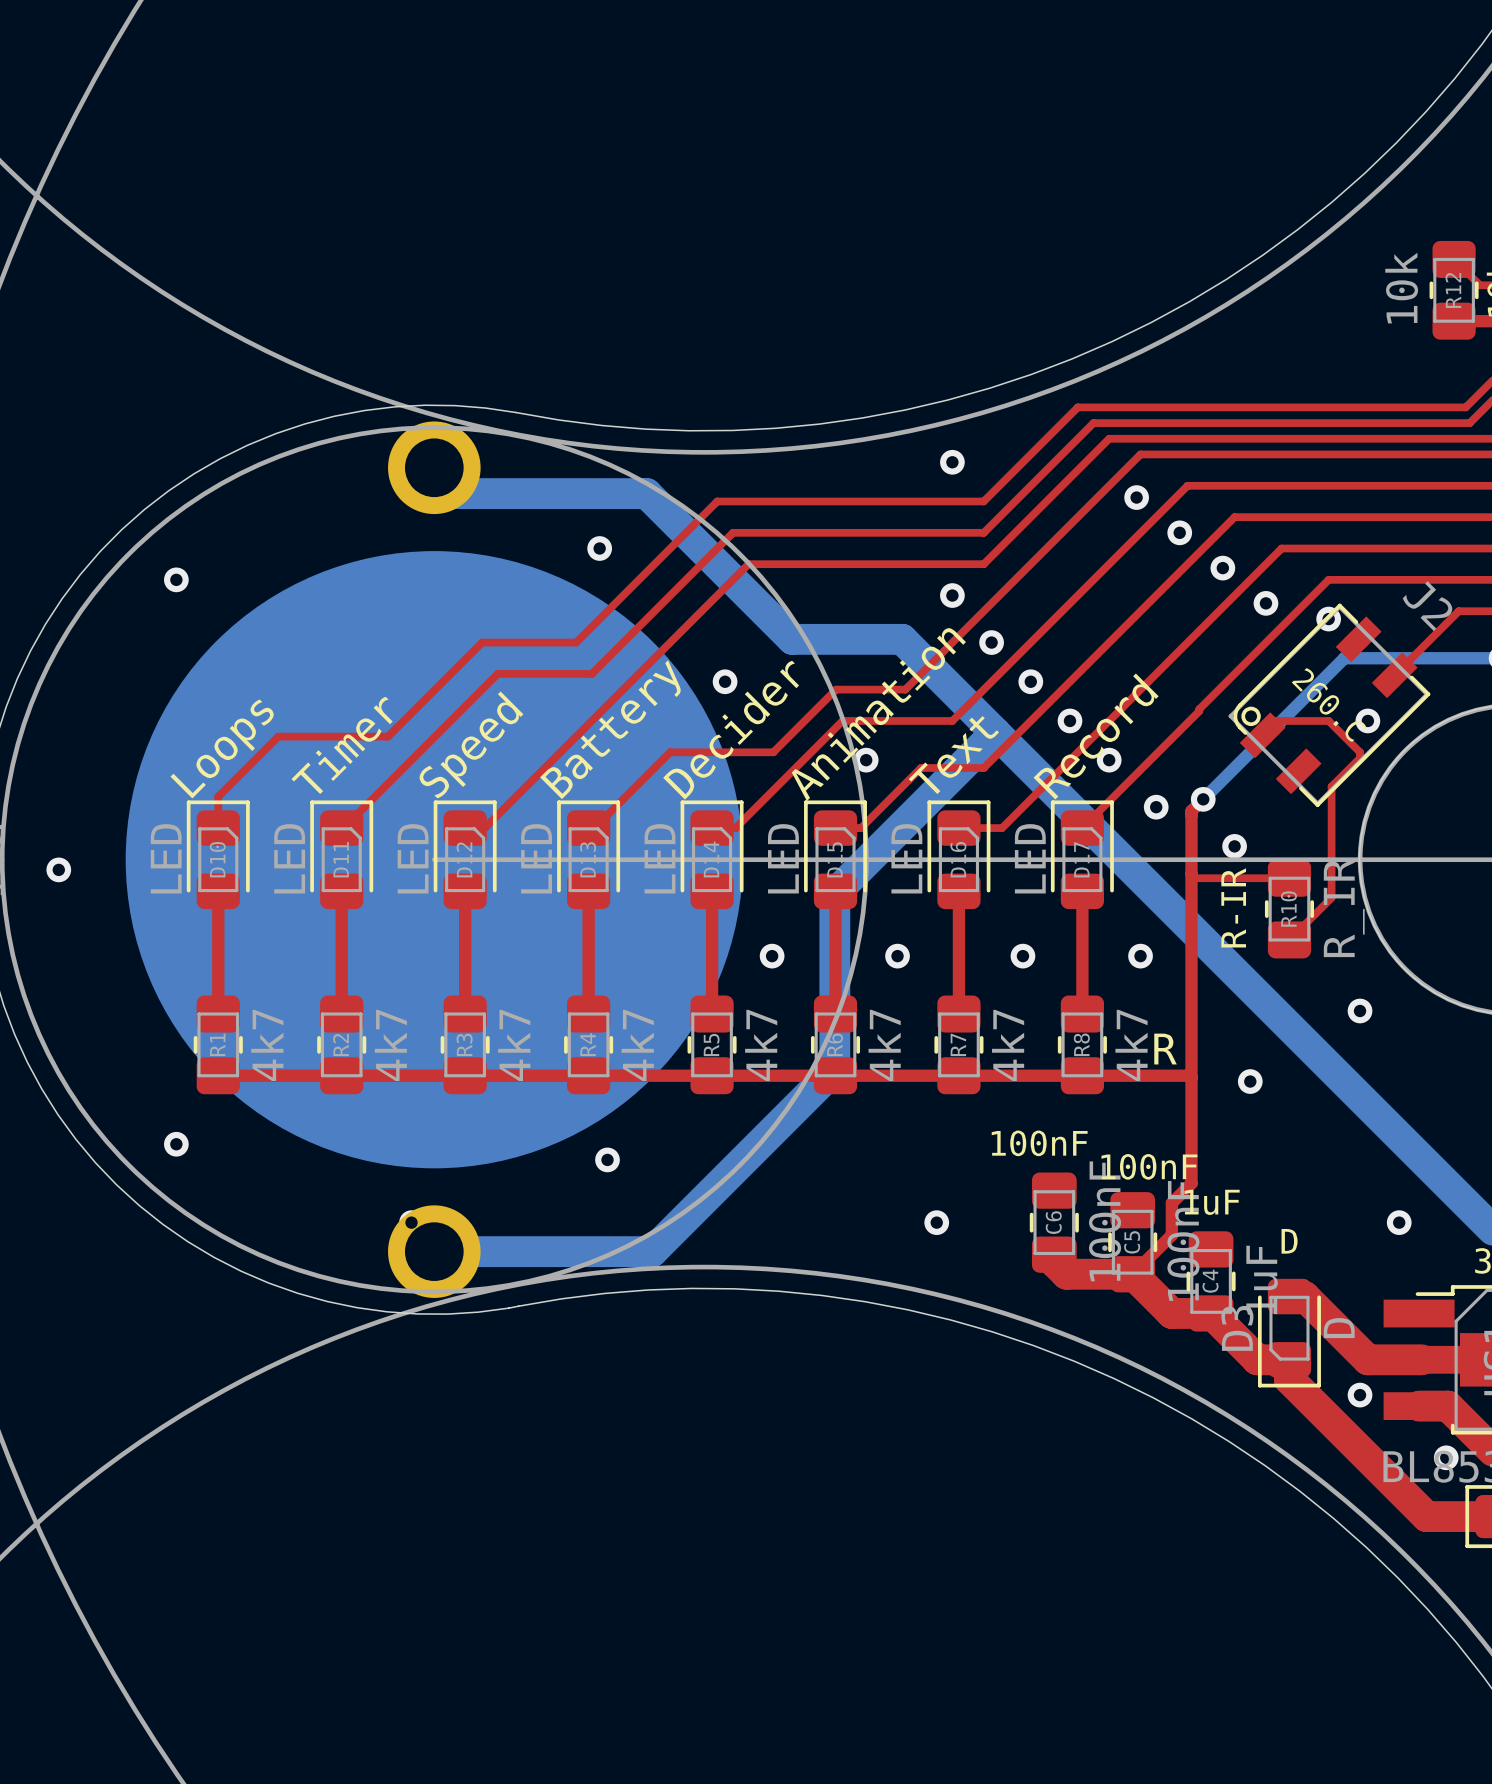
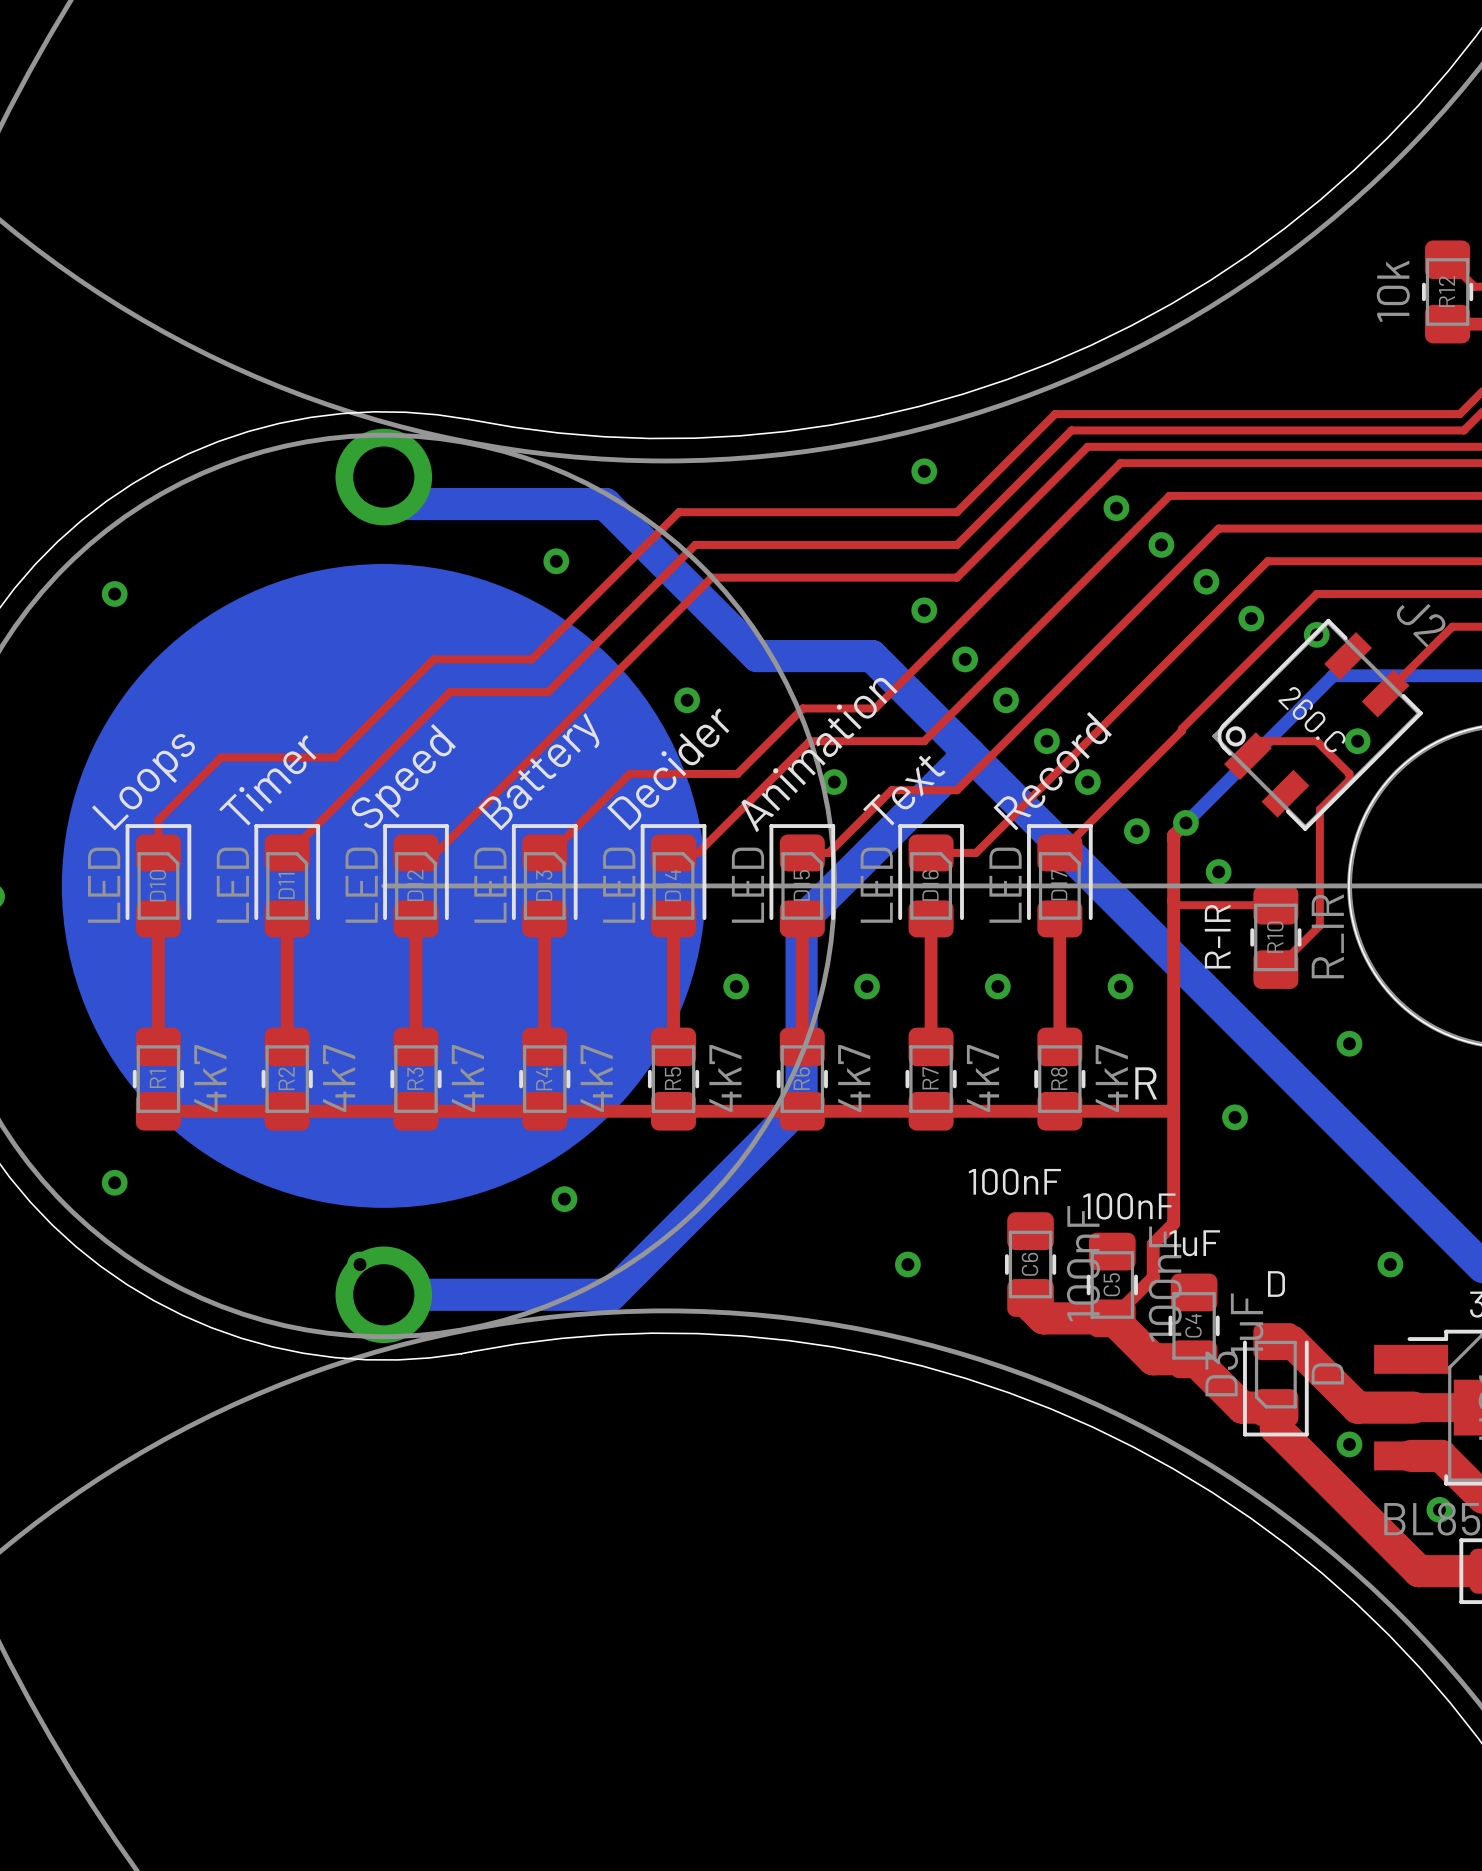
text position: Animation (878, 714) -> Animation (819, 755)
text position: Battery (610, 729) -> Battery (538, 771)
text position: Decider (731, 730) -> Decider (668, 769)
text position: Record (1096, 736) -> Record (1052, 771)
text position: Speed (471, 744) -> Speed (403, 776)
text position: Timer (342, 745) -> Timer (267, 780)
text position: Loops (222, 748) -> Loops (143, 782)
text position: Text (953, 755) -> Text (904, 790)

